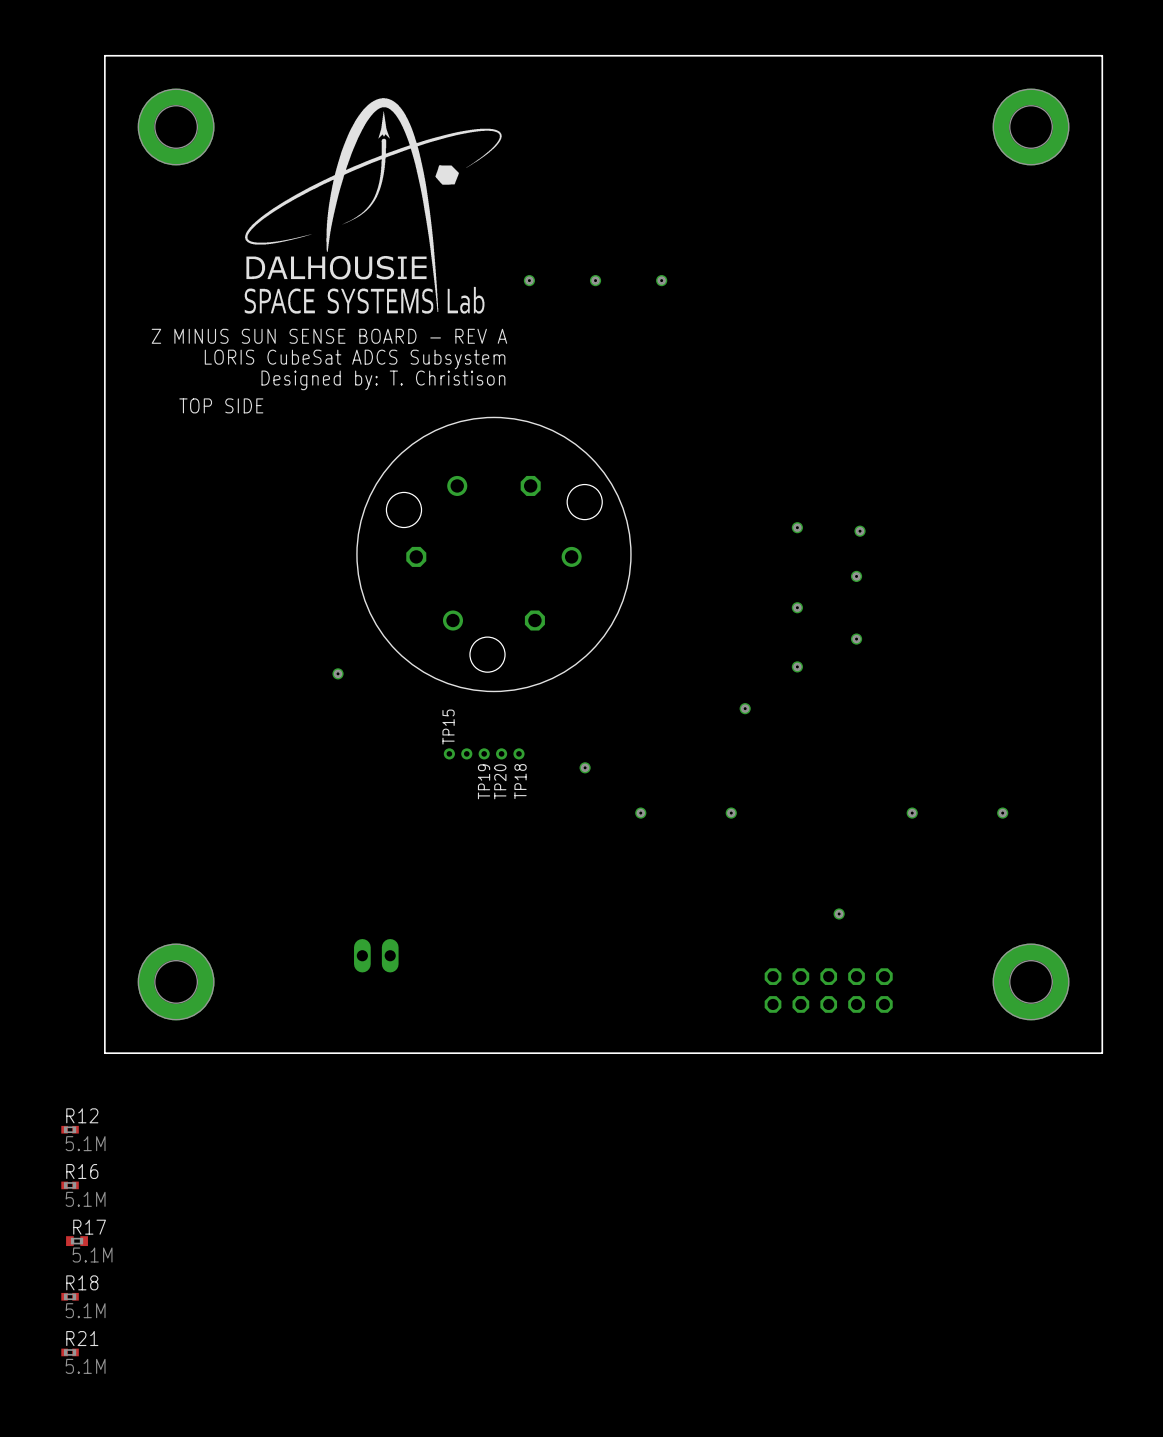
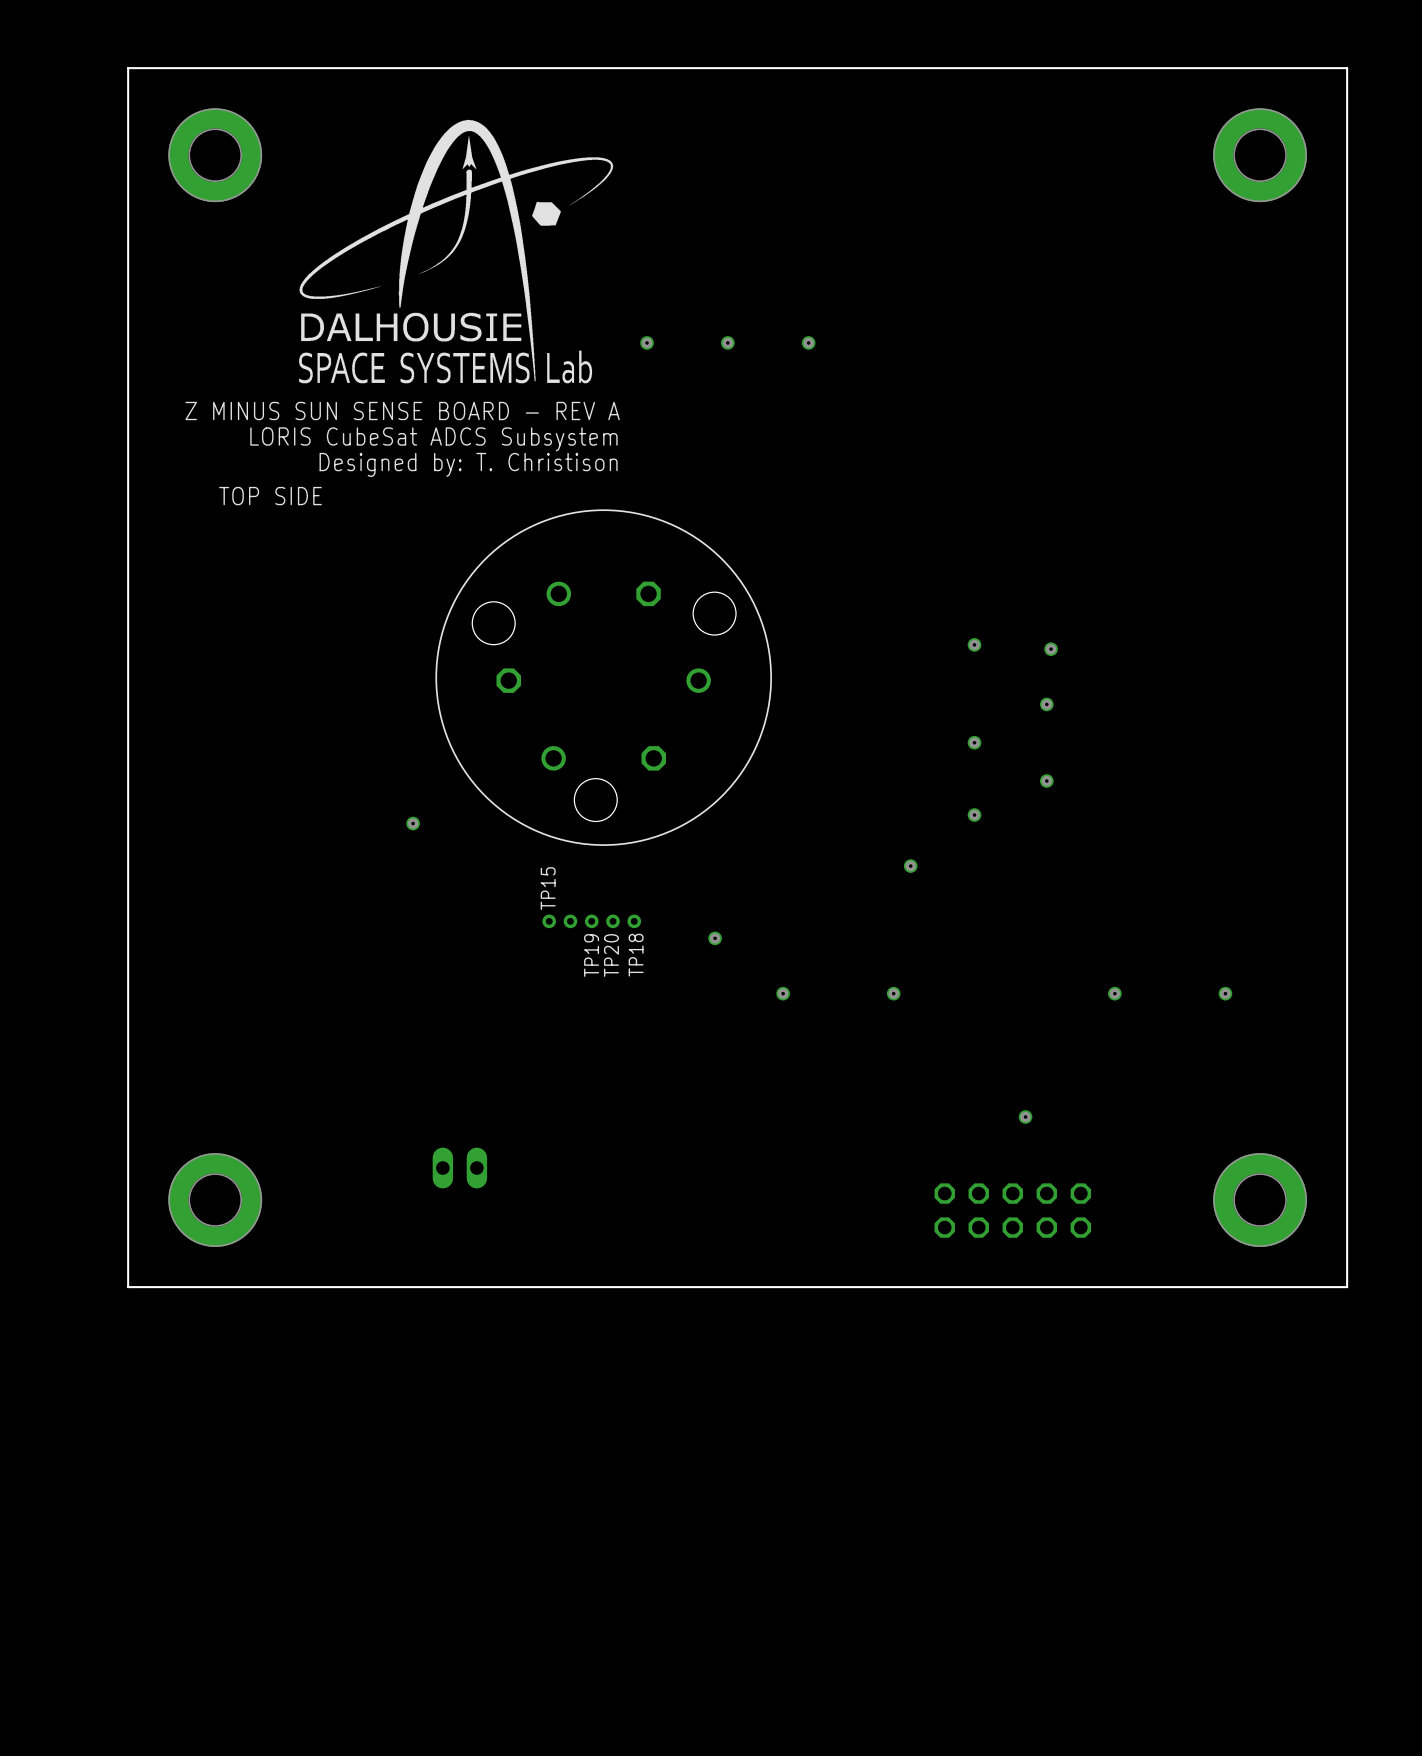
R12: 5.1M (70, 1129) -> none
R16: 5.1M (70, 1185) -> none
R17: 5.1M (77, 1241) -> none
R18: 5.1M (70, 1296) -> none
R21: 5.1M (70, 1352) -> none

